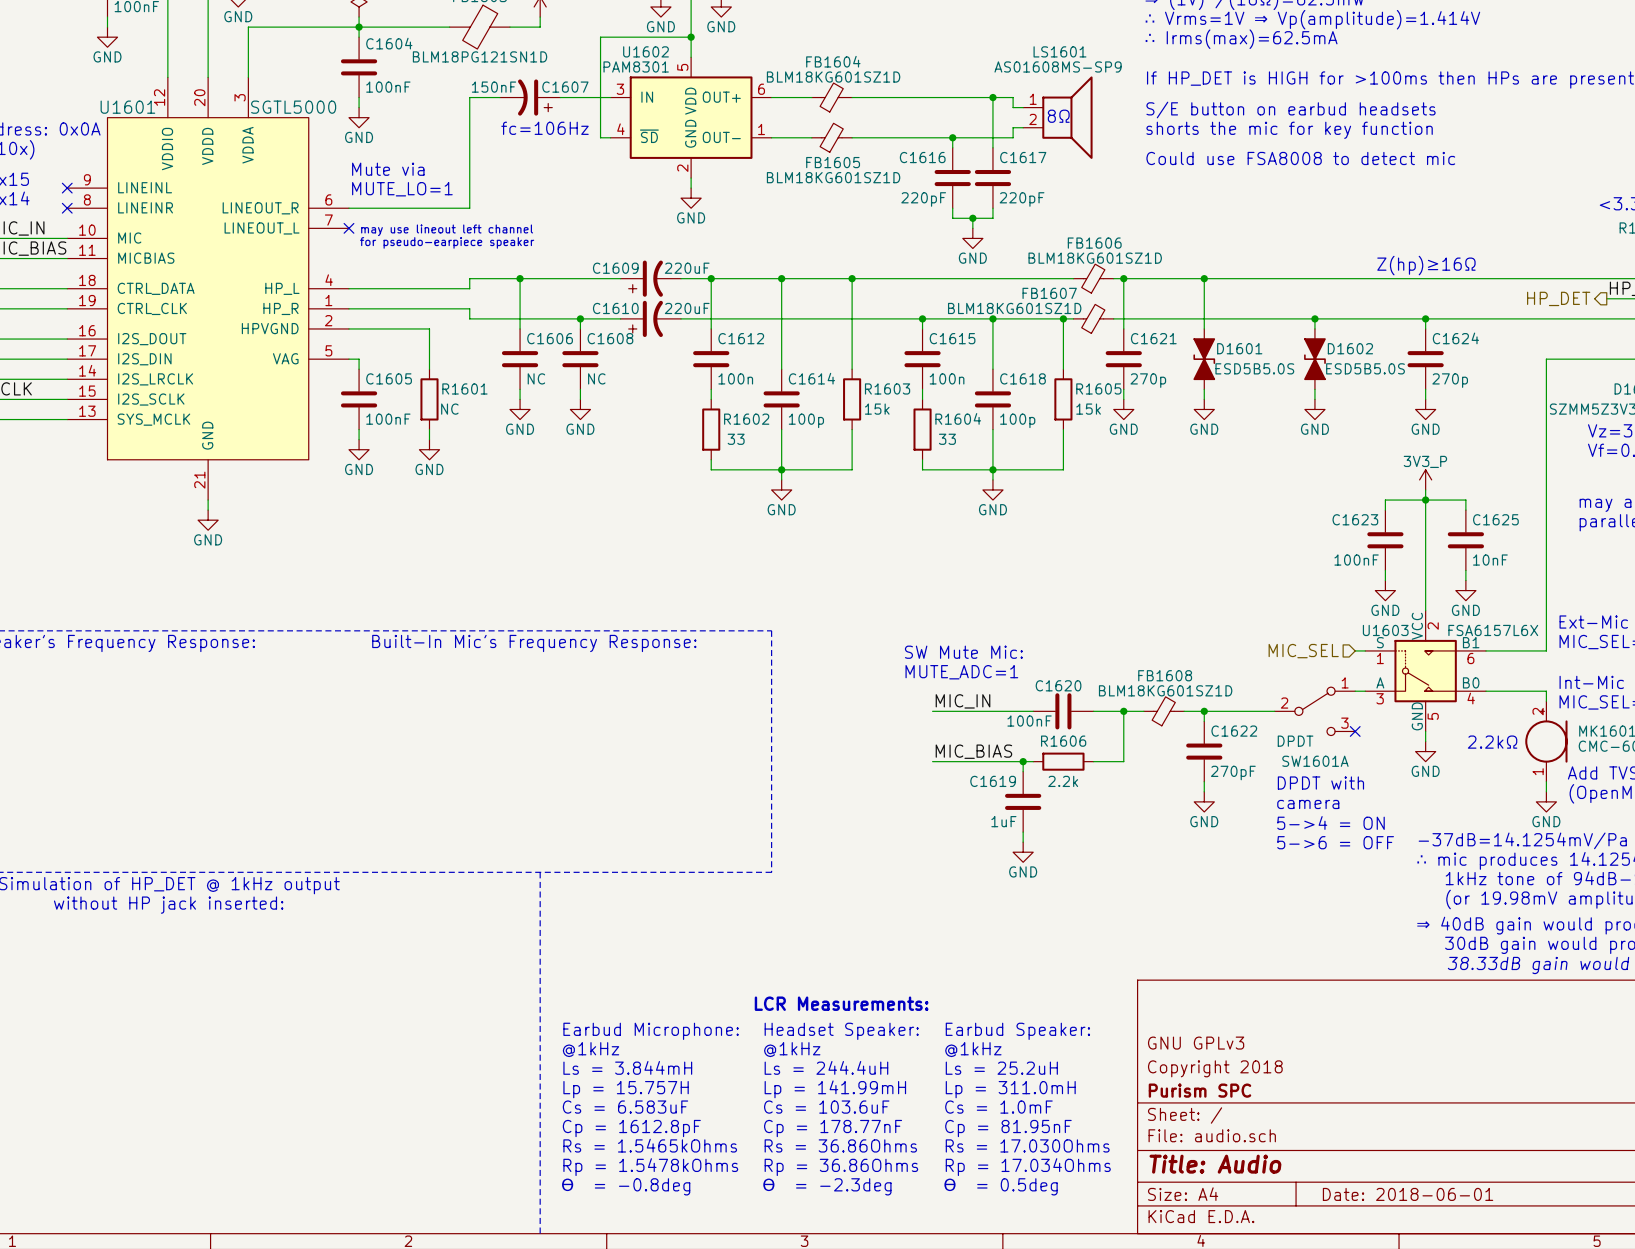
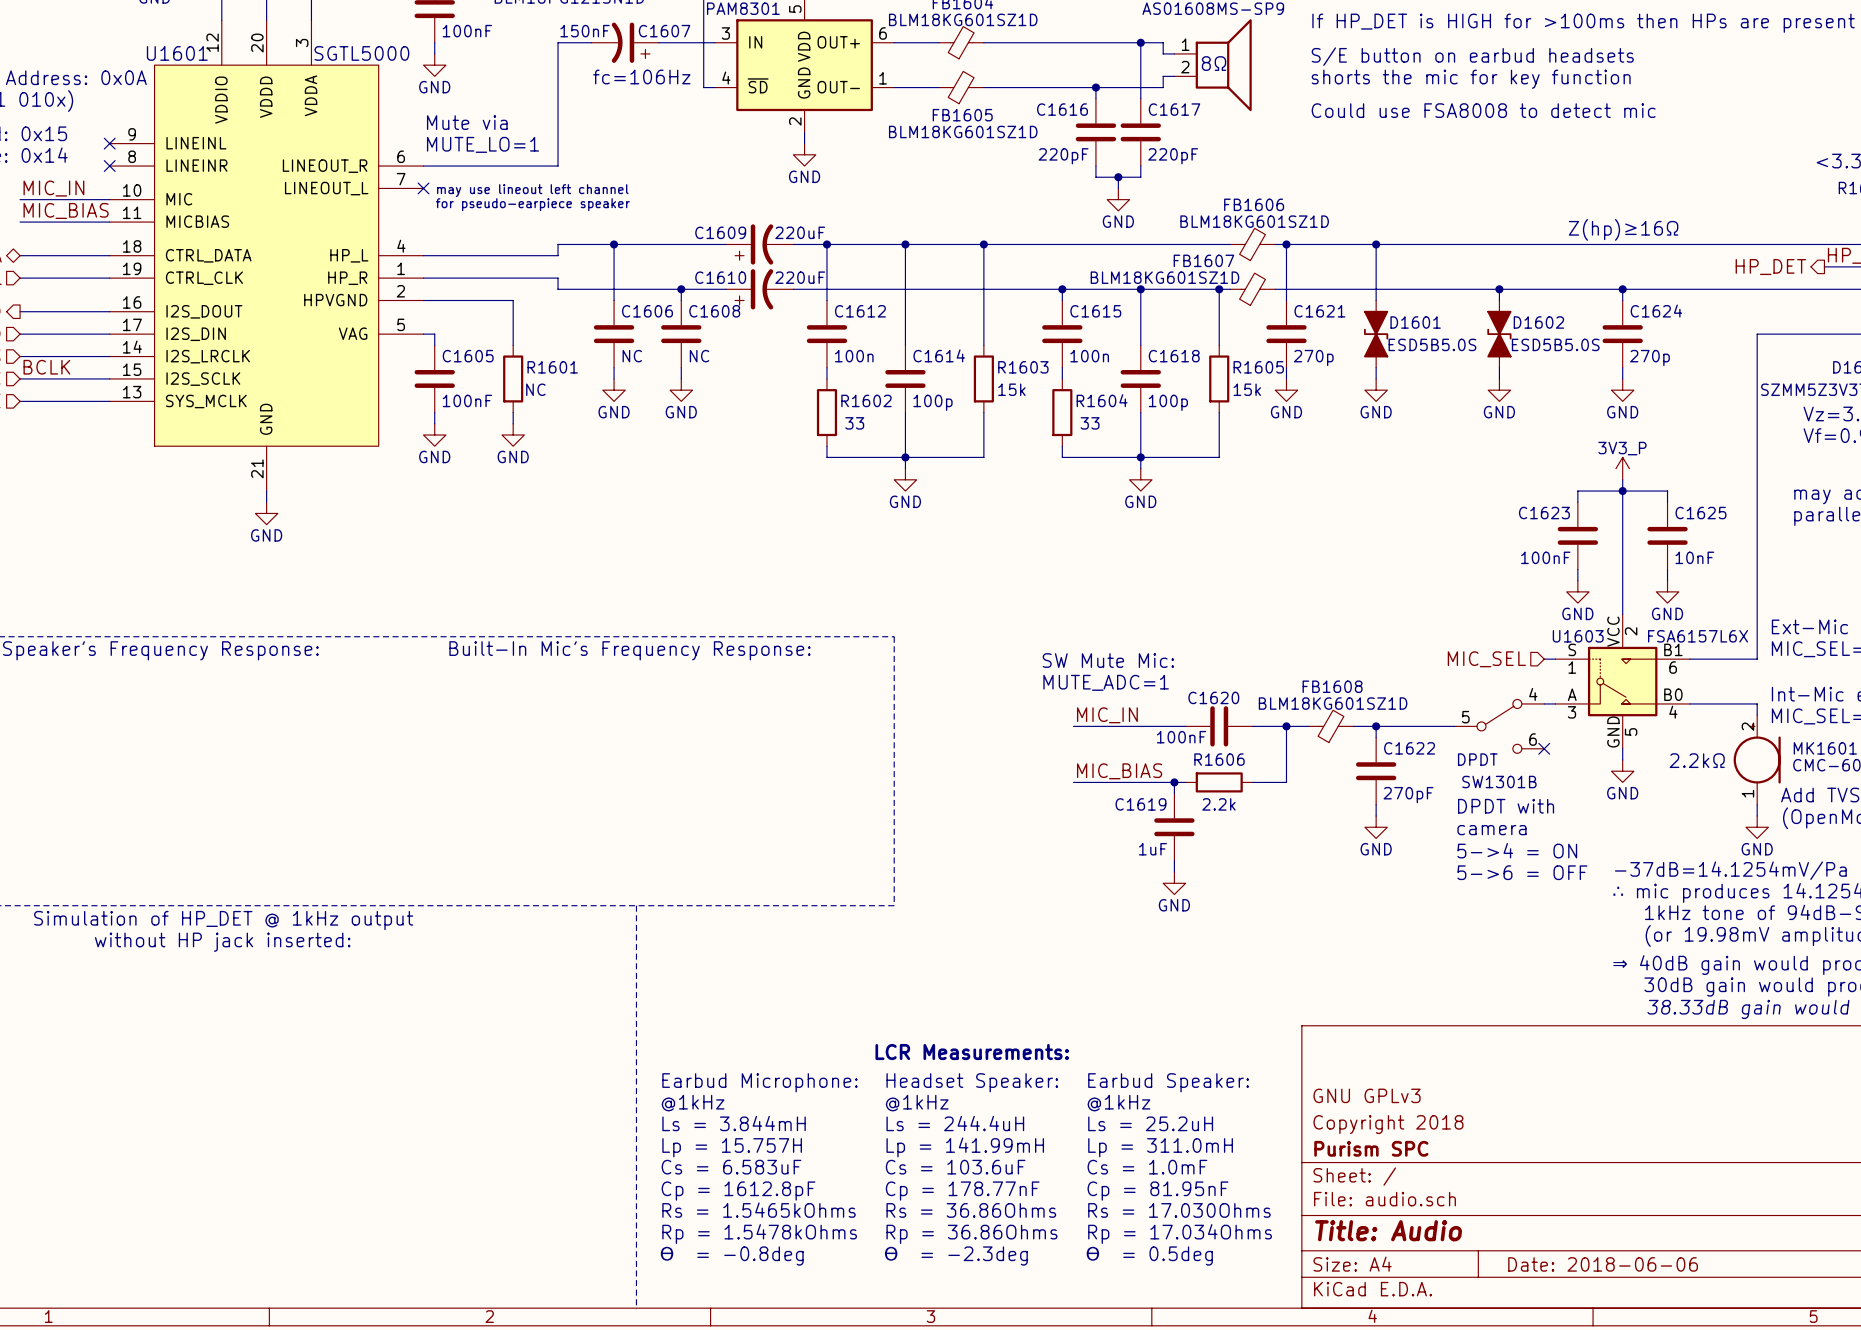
SW1601A pin number: 1 (1345, 682) -> 4 (1533, 694)
SW1601A pin number: 2 (1284, 703) -> 5 (1465, 717)
SW1601A pin number: 3 (1344, 723) -> 6 (1533, 739)
SW1601A name: SW1601A (1315, 761) -> SW1301B (1499, 782)
title block: Date: 2018-06-01 (1408, 1194) -> Date: 2018-06-06 (1603, 1264)

